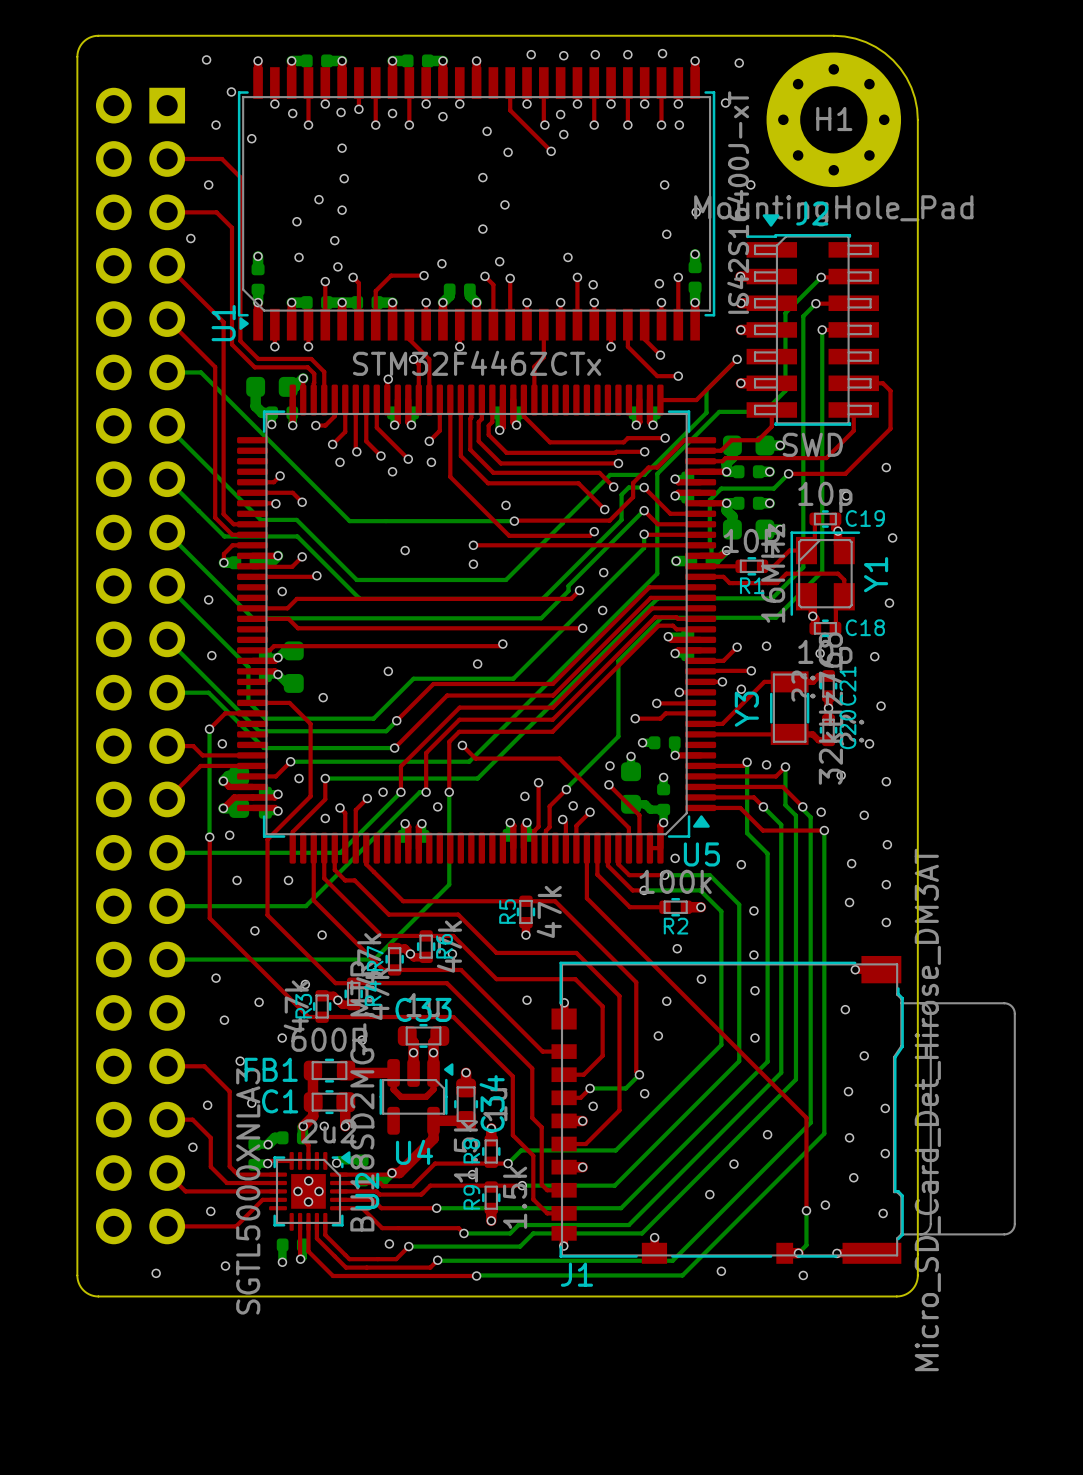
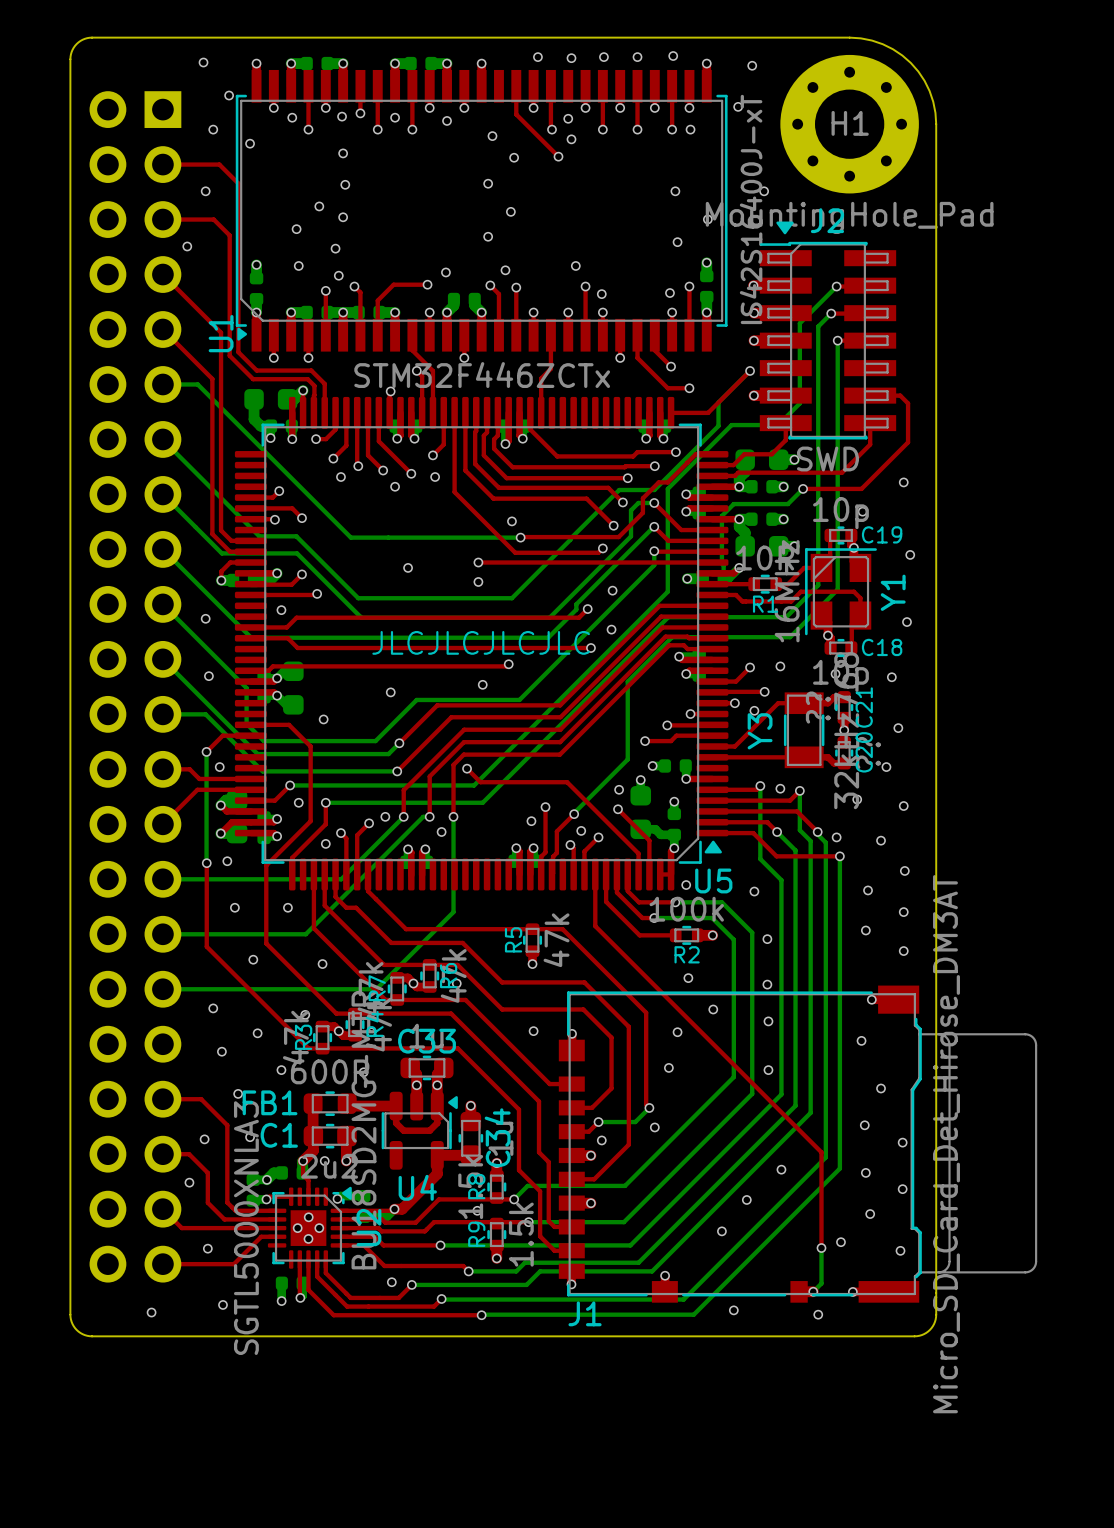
text: none -> JLCJLCJLCJLC (481, 642)

